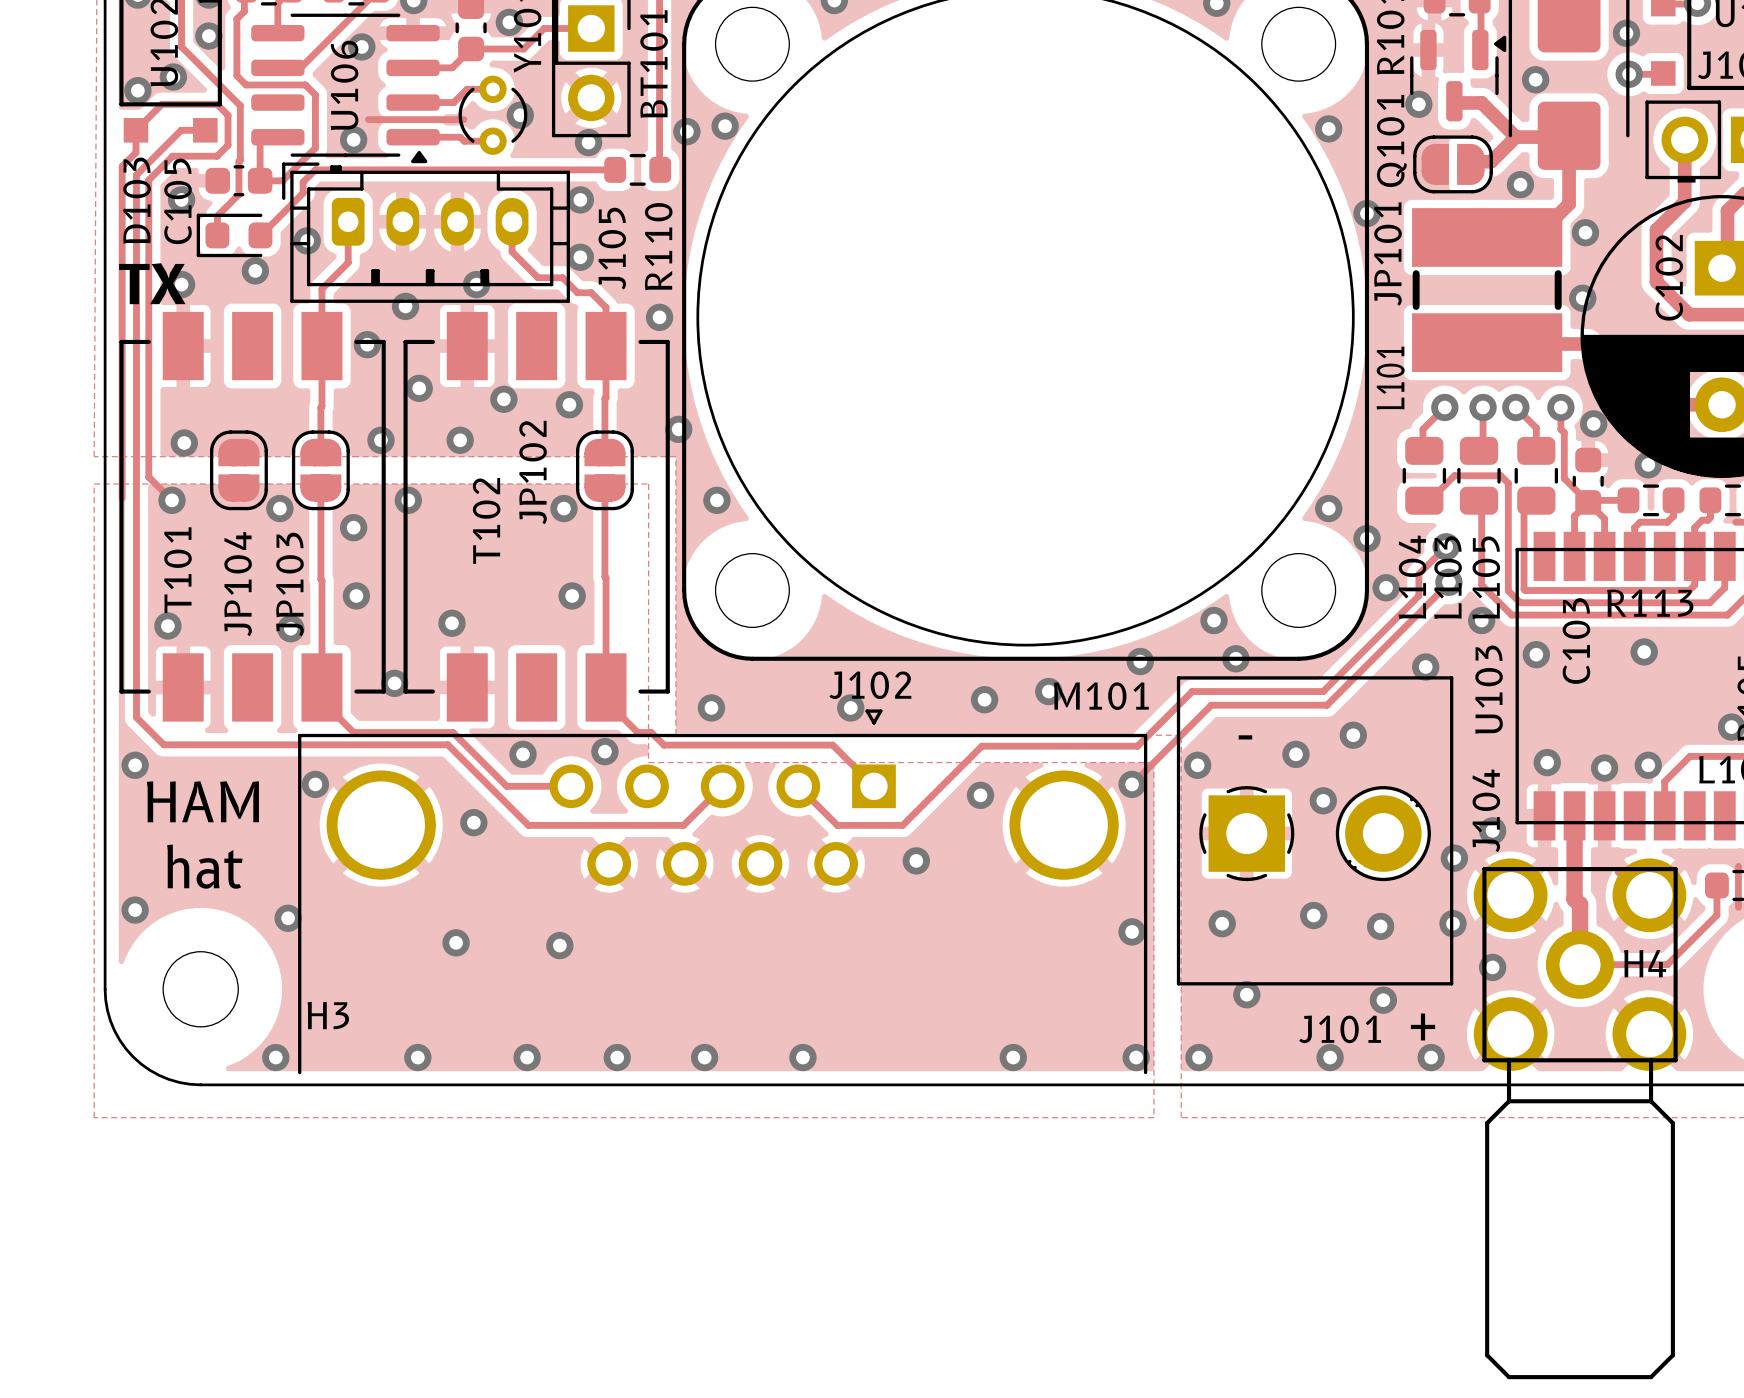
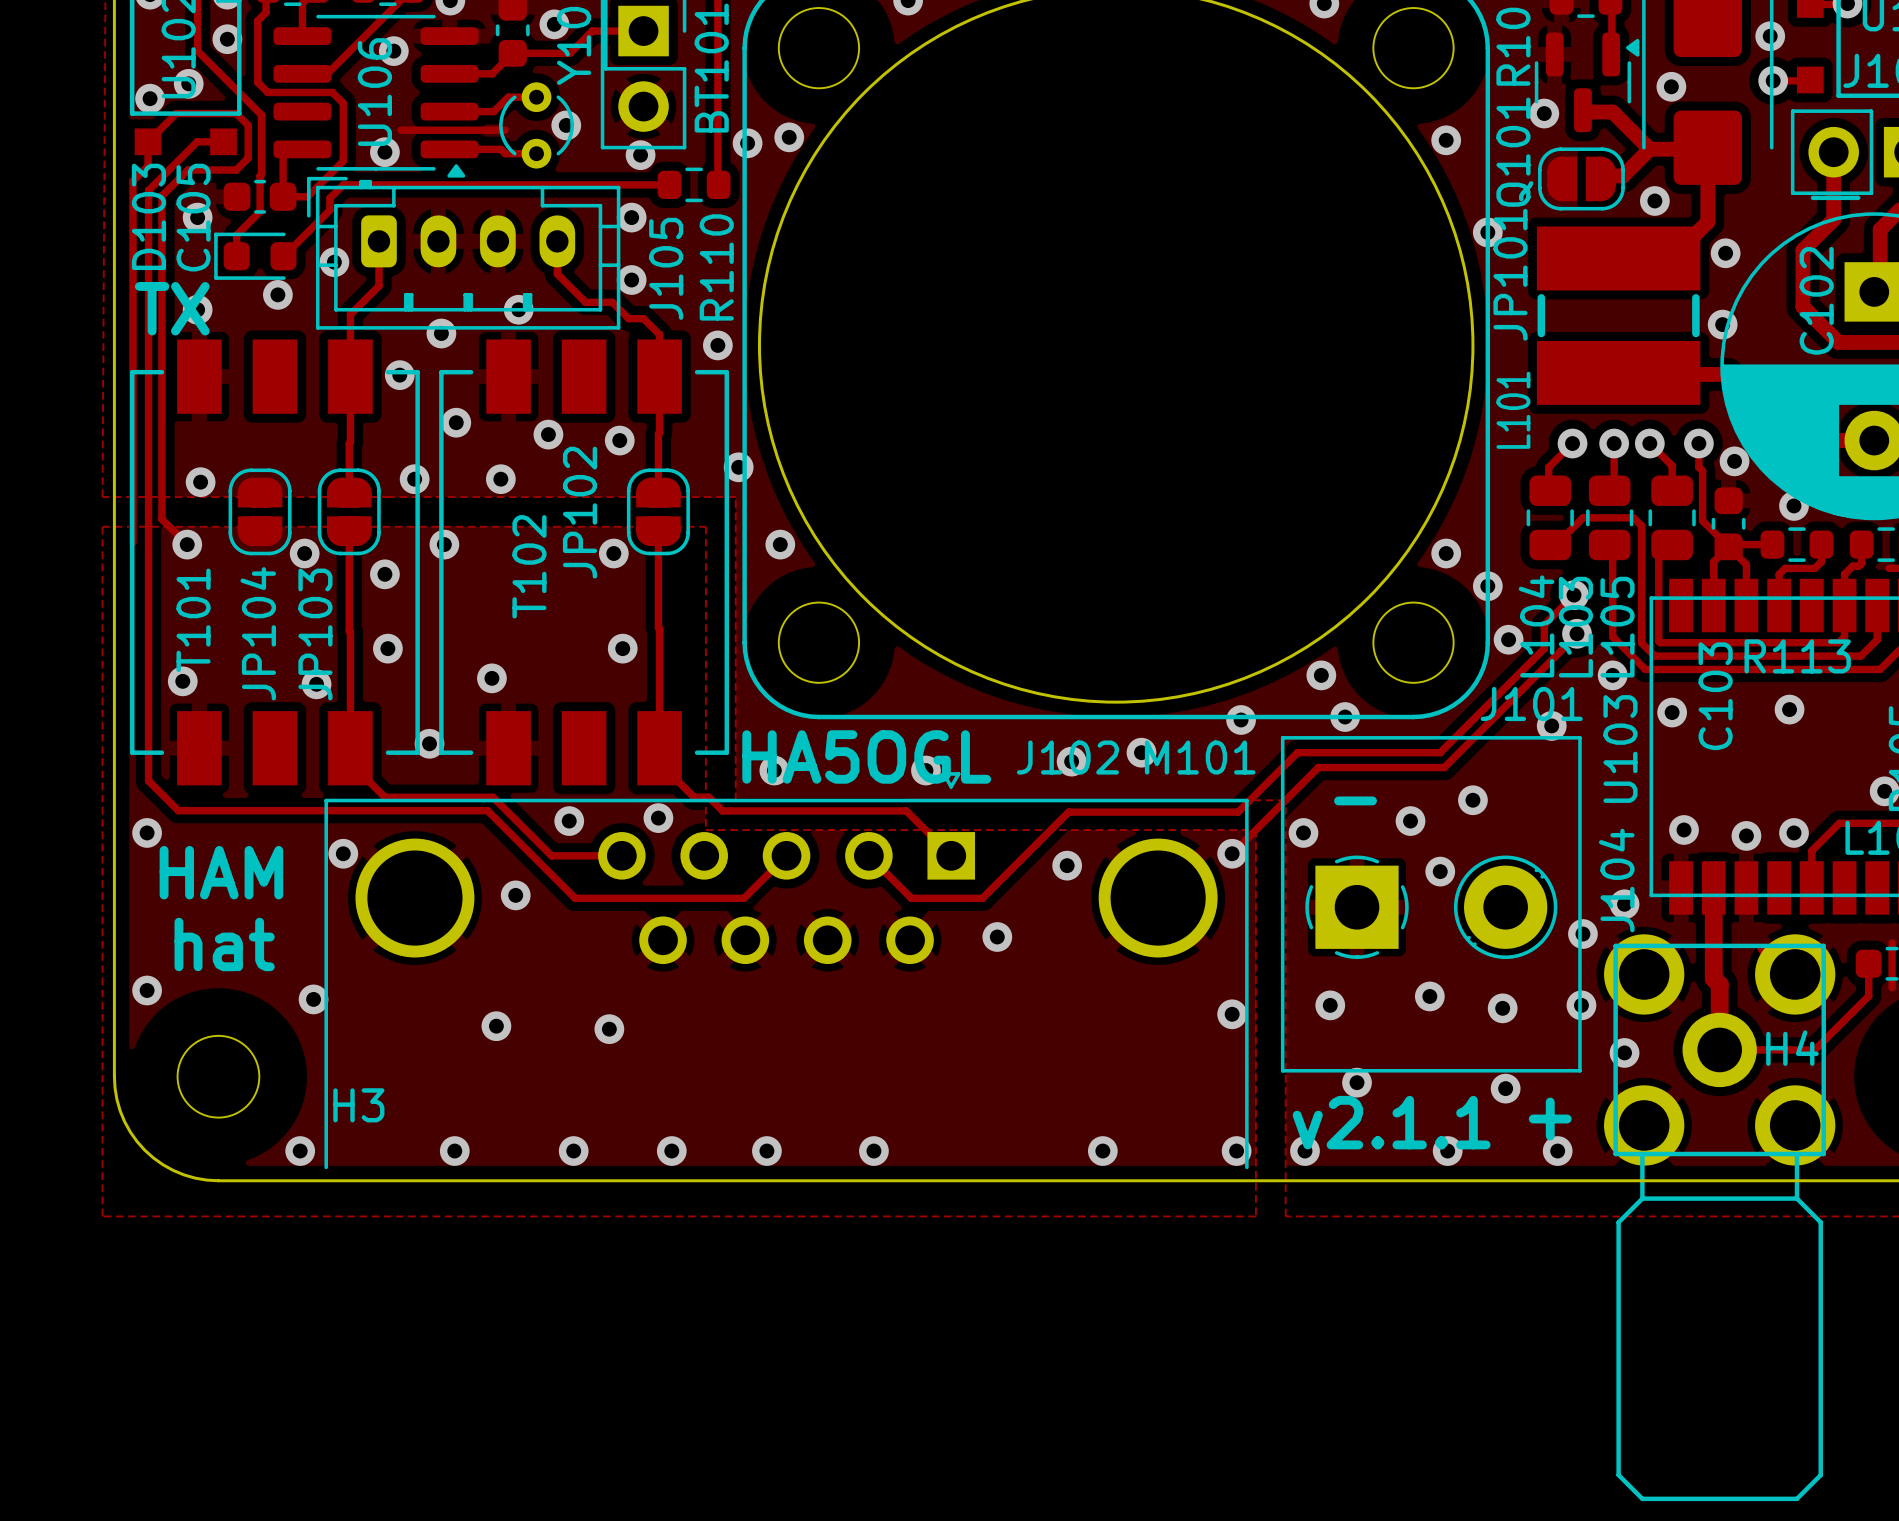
J102 name position: J102 (870, 685) -> J102 (1067, 757)
text: none -> HA5OGL (866, 756)
J101 name position: J101 (1340, 1029) -> J101 (1531, 704)
text: none -> v2.1.1 (1391, 1122)

